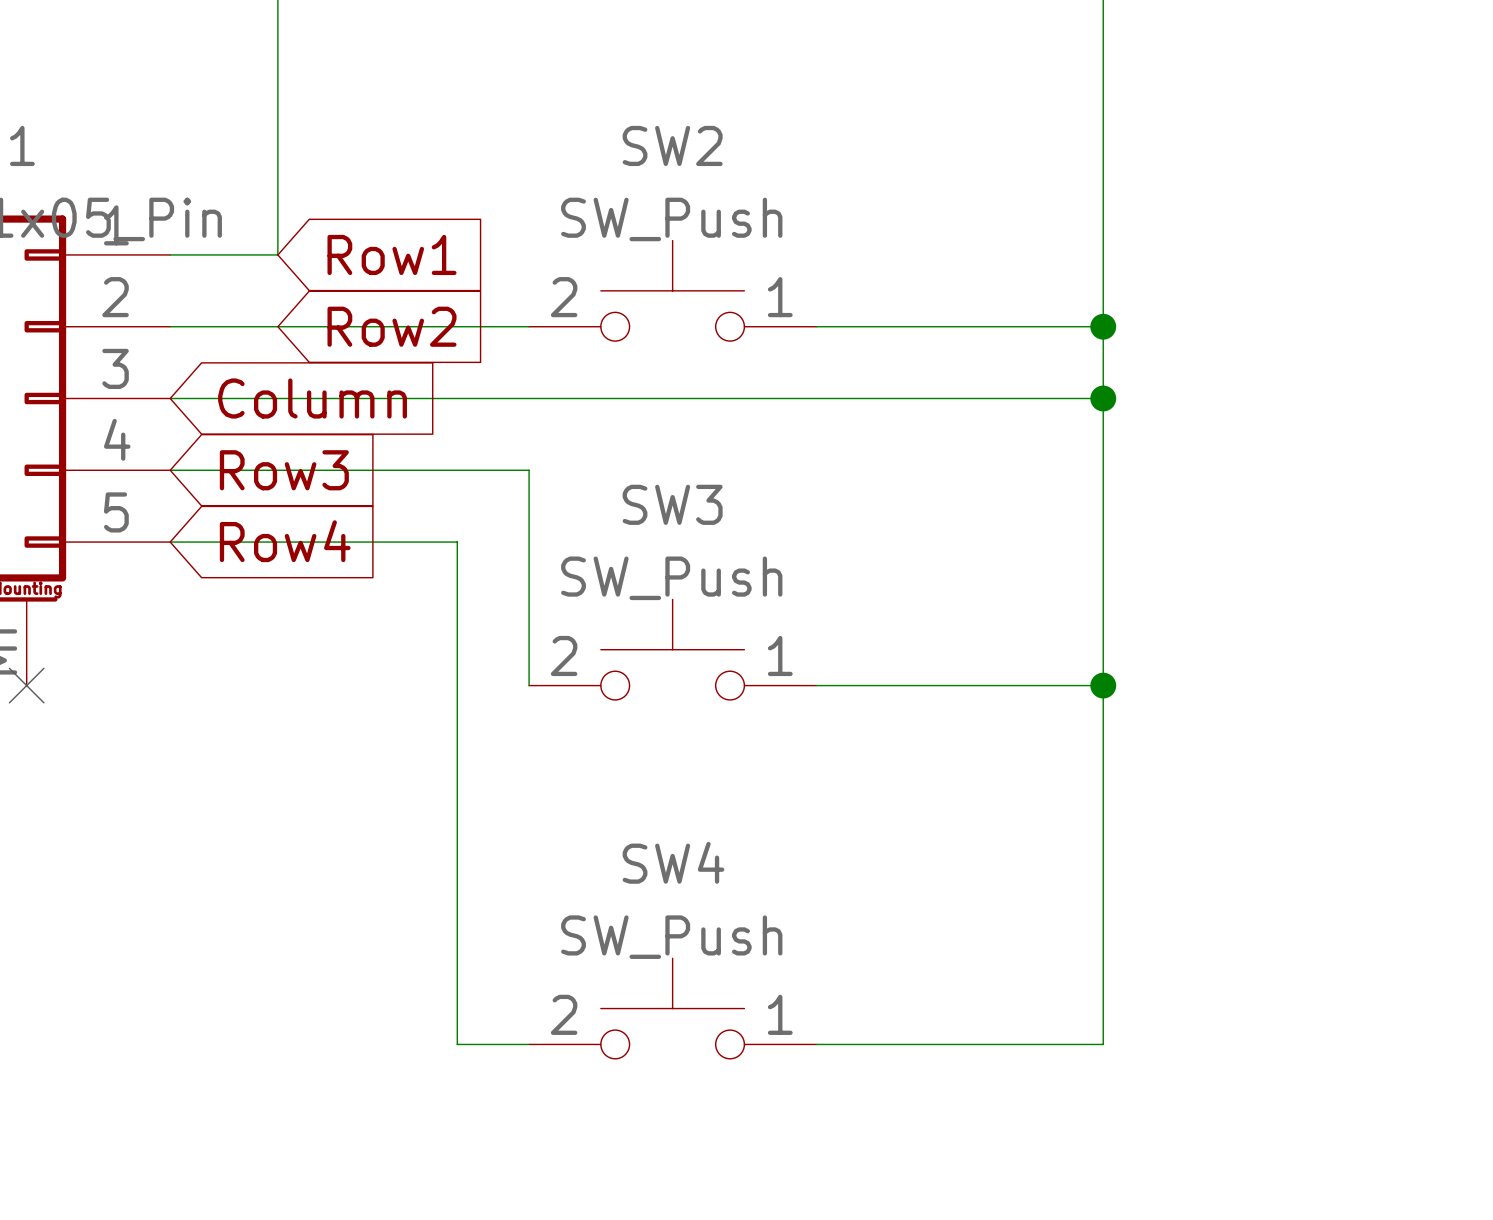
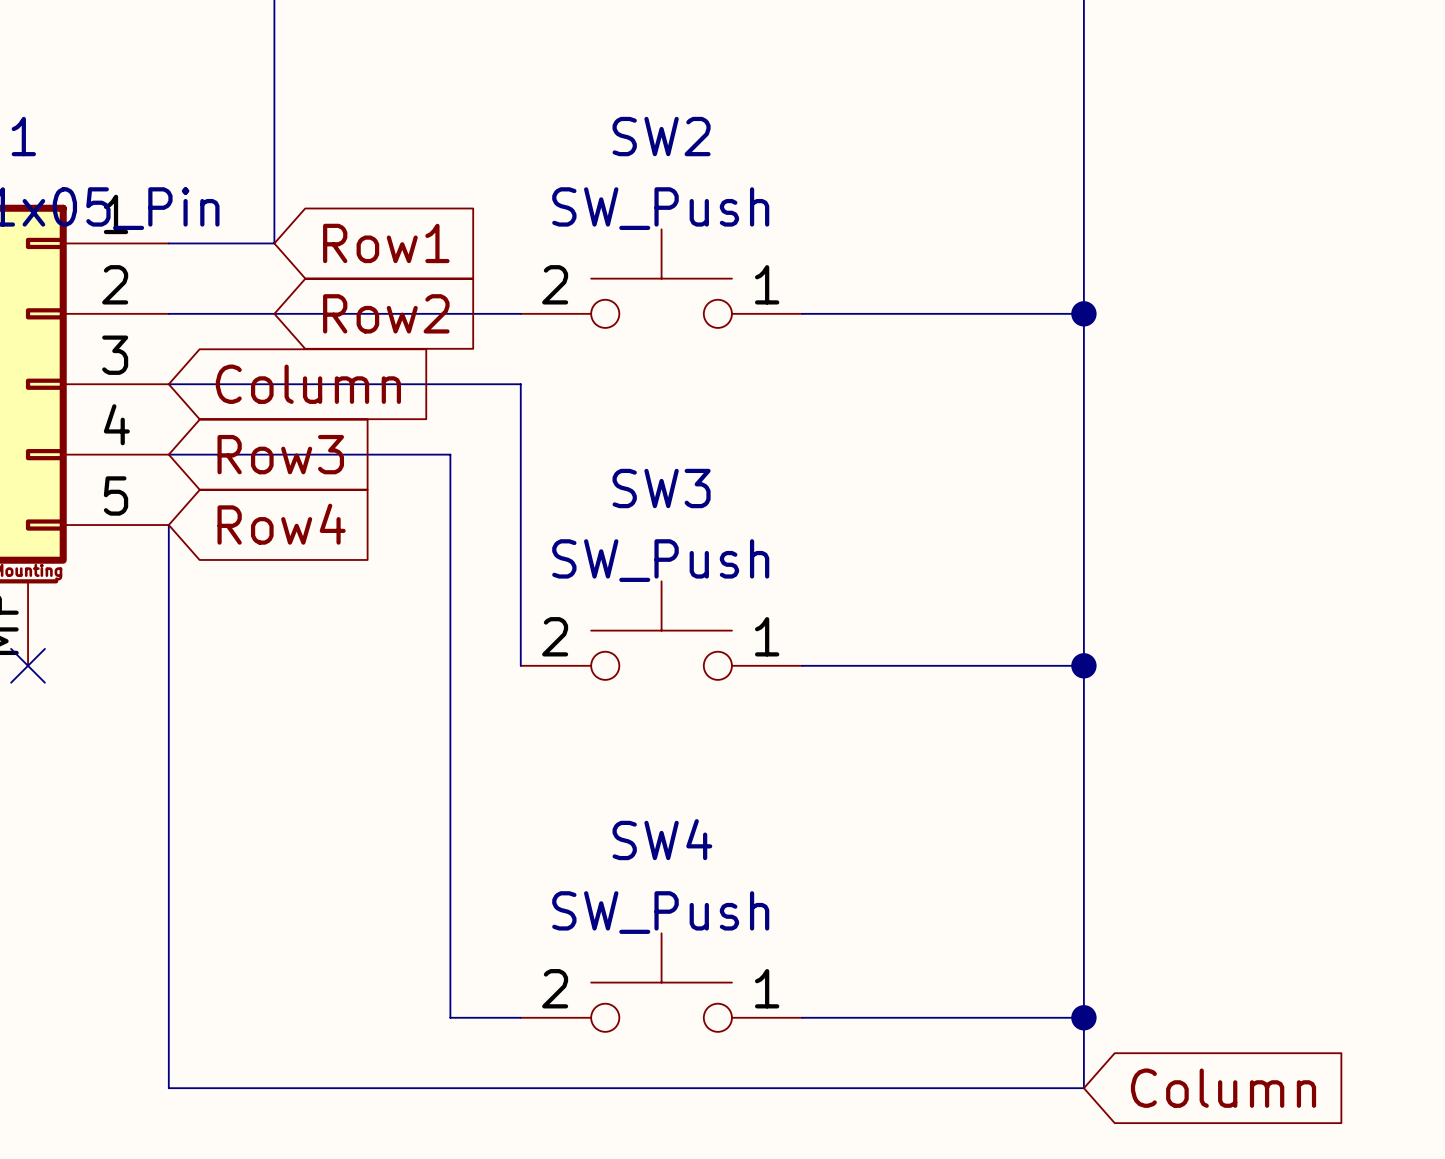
wire: (529, 398) (1103, 398) -> (520, 384) (520, 454)
junction: (1103, 398) -> none
wire: (457, 470) (529, 470) -> (450, 454) (450, 525)
wire: (170, 542) (457, 542) -> (168, 525) (168, 1088) (1083, 1088) (1083, 1017)
junction: none -> (1083, 1017)
global label: none -> Column (1223, 1088)

